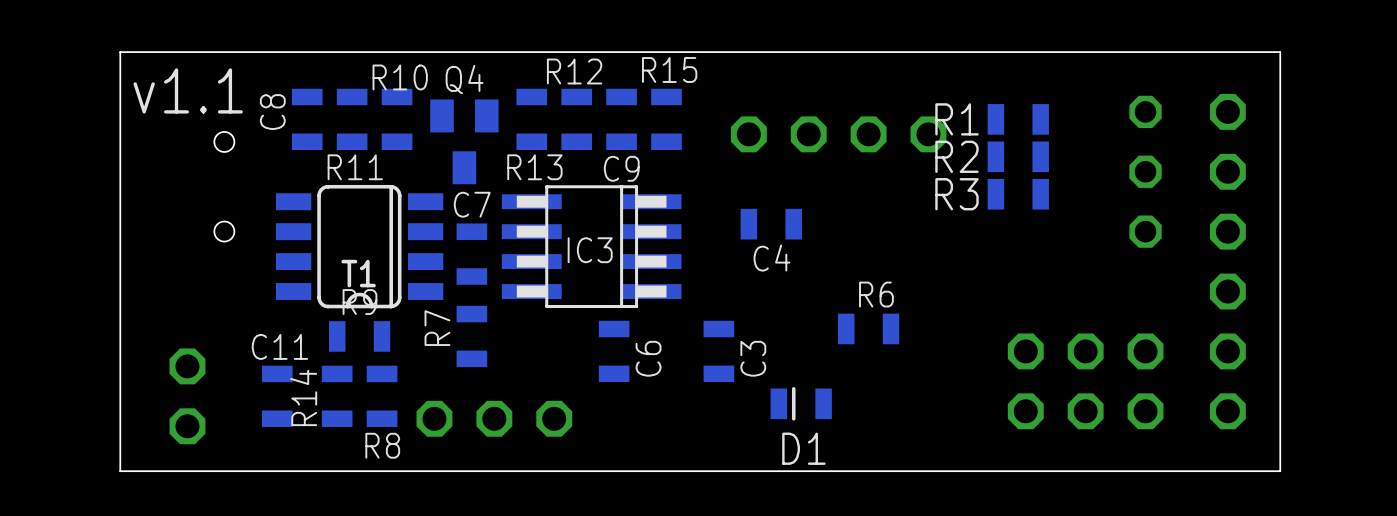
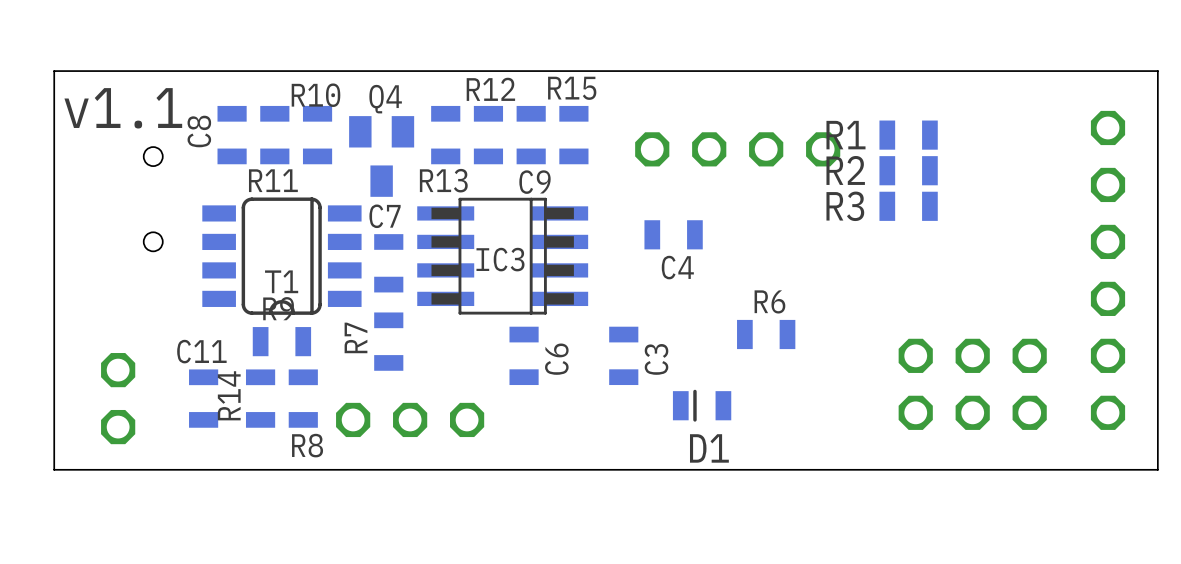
part: (1145, 171) -> none

